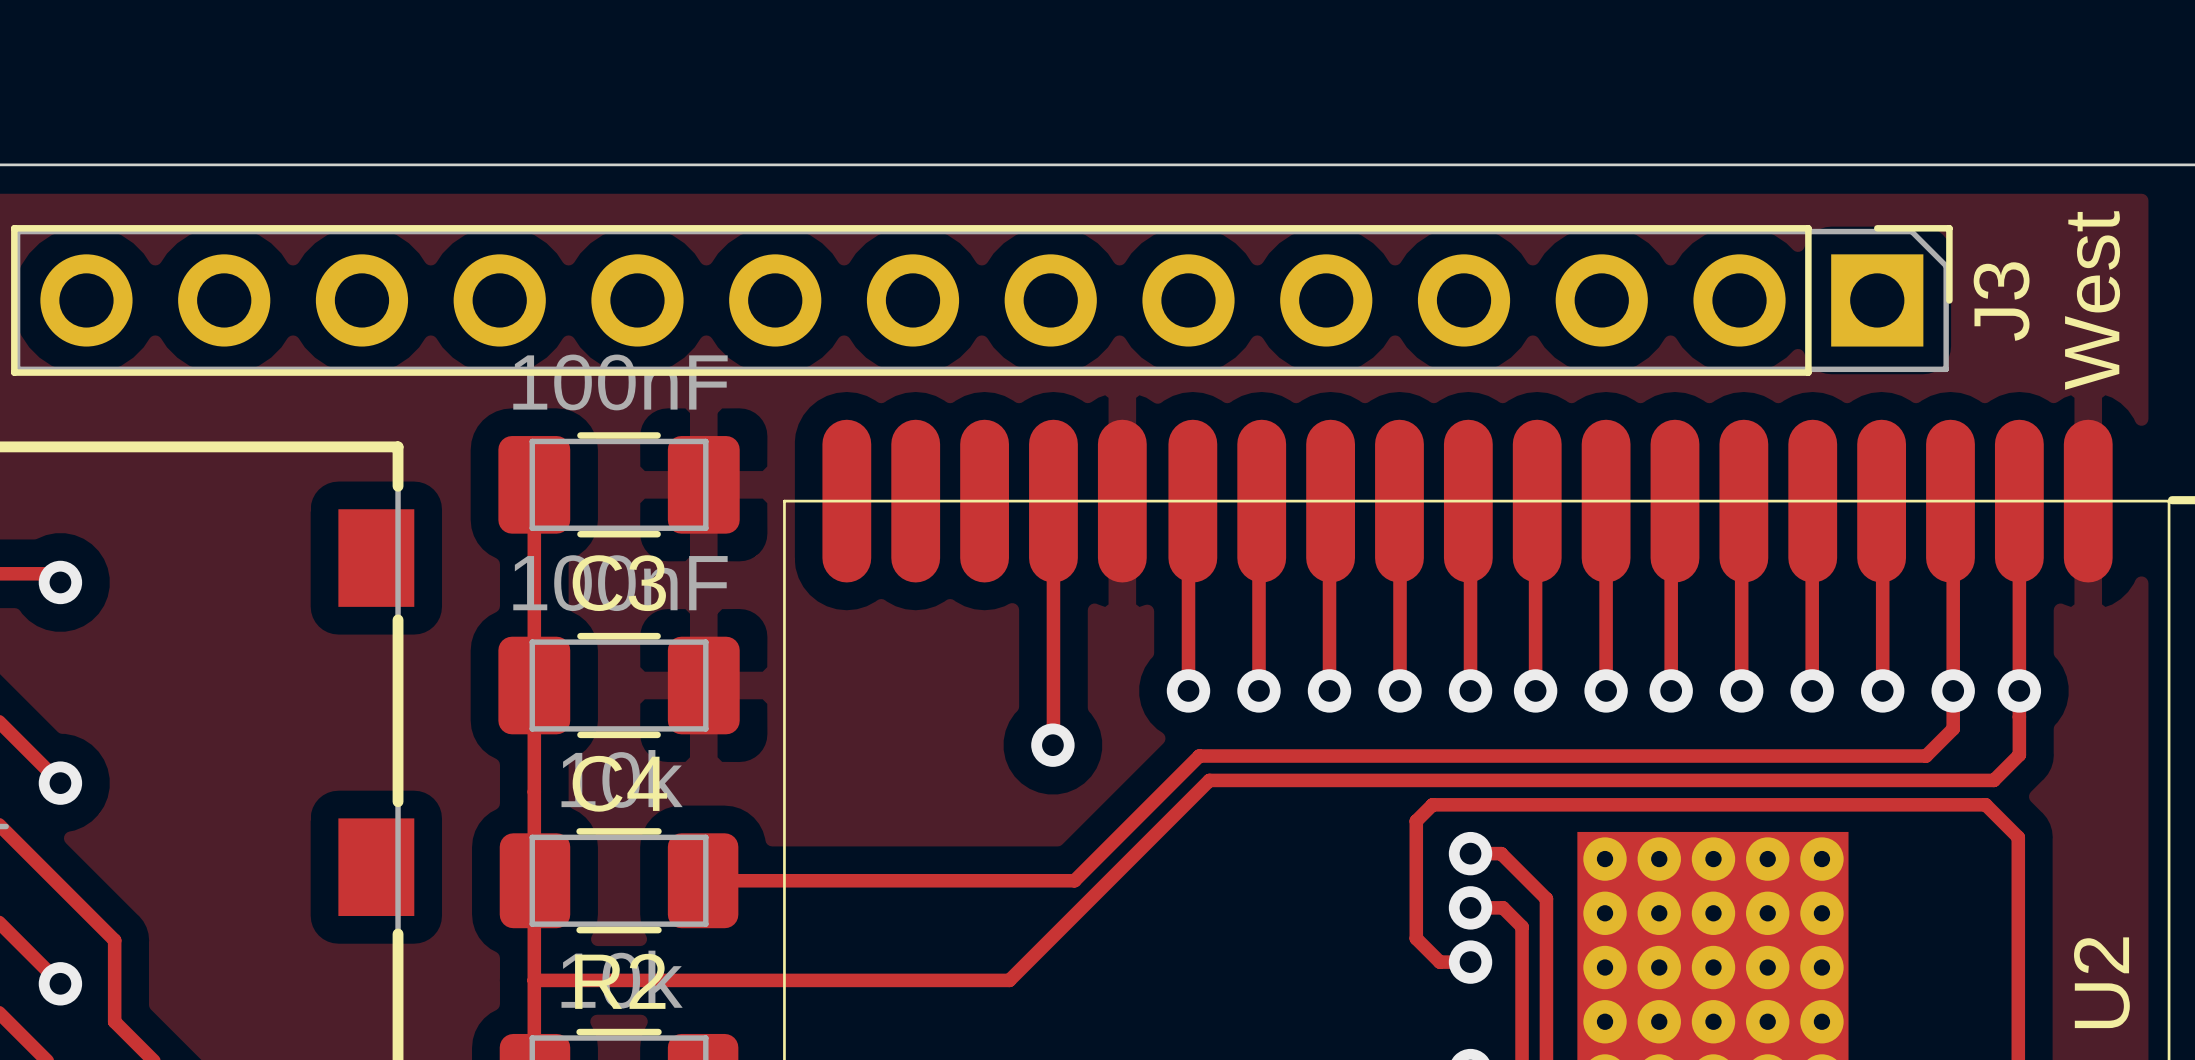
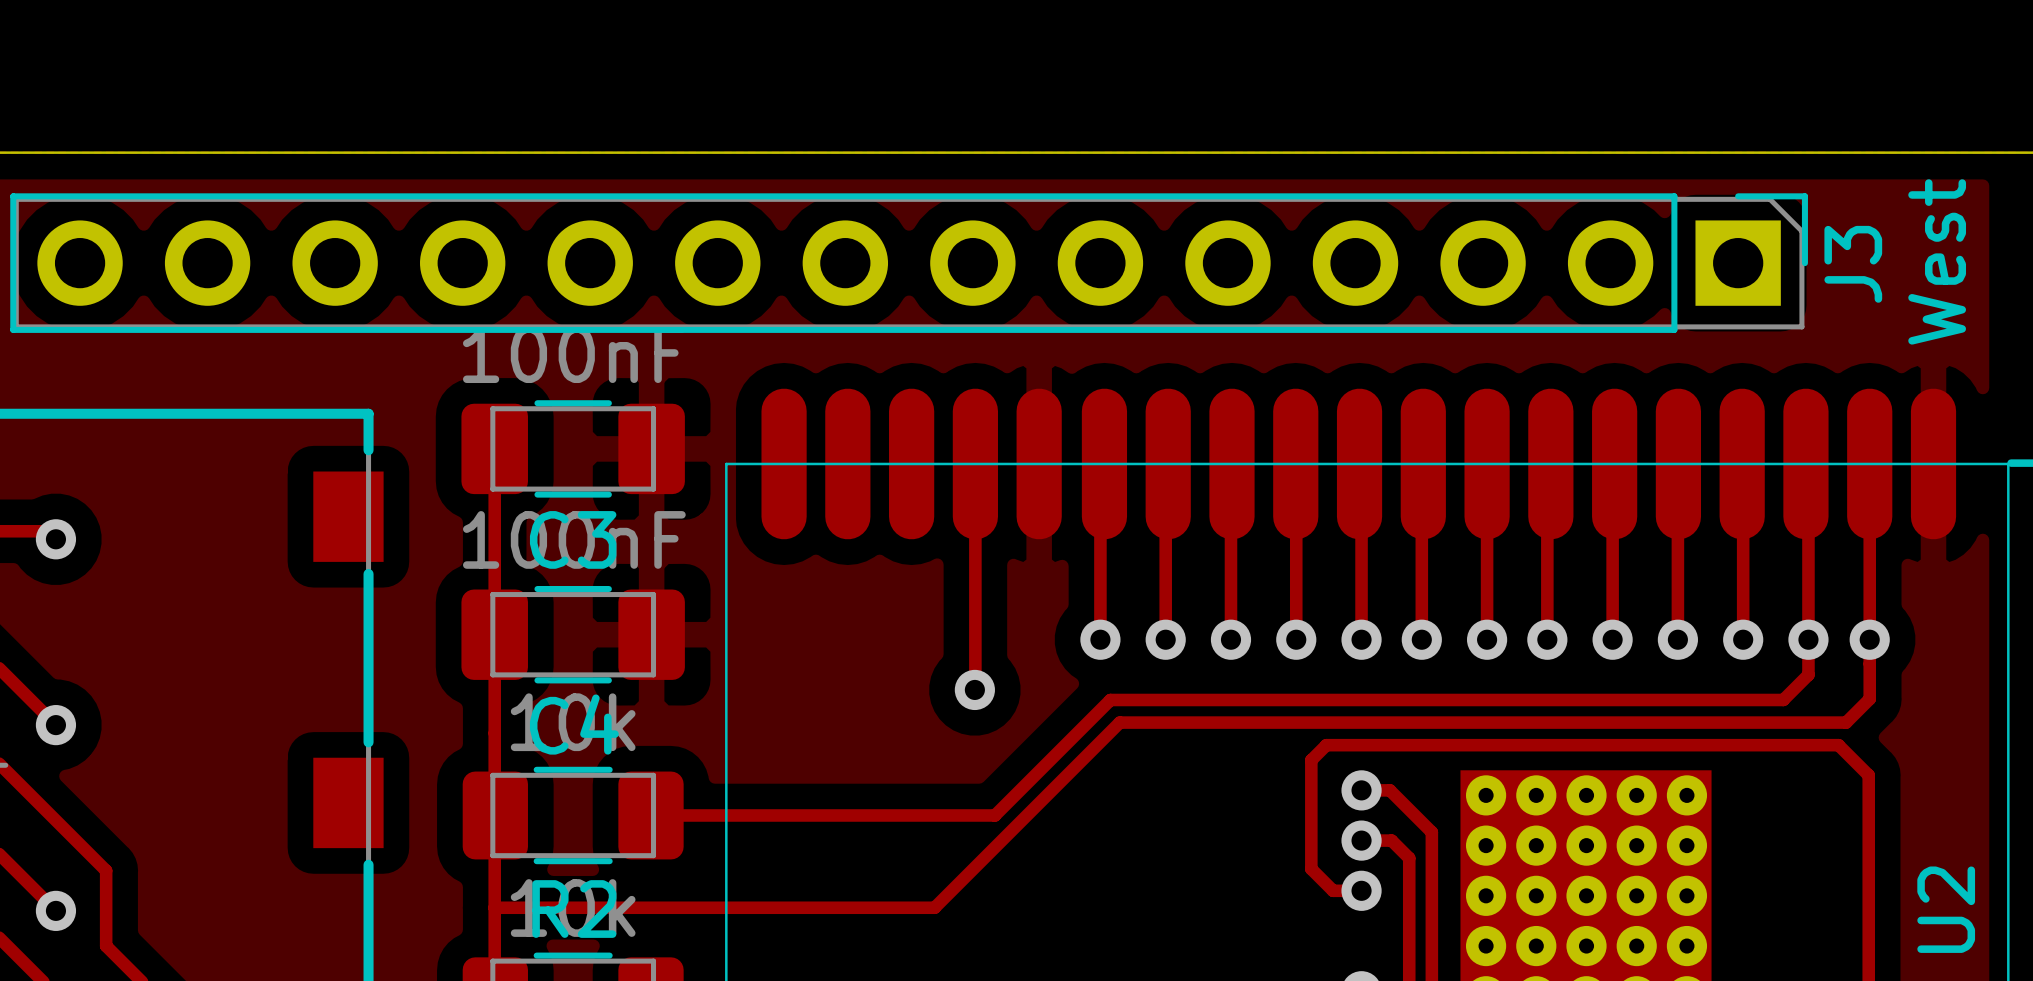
J3 position: (981, 300) -> (909, 263)

